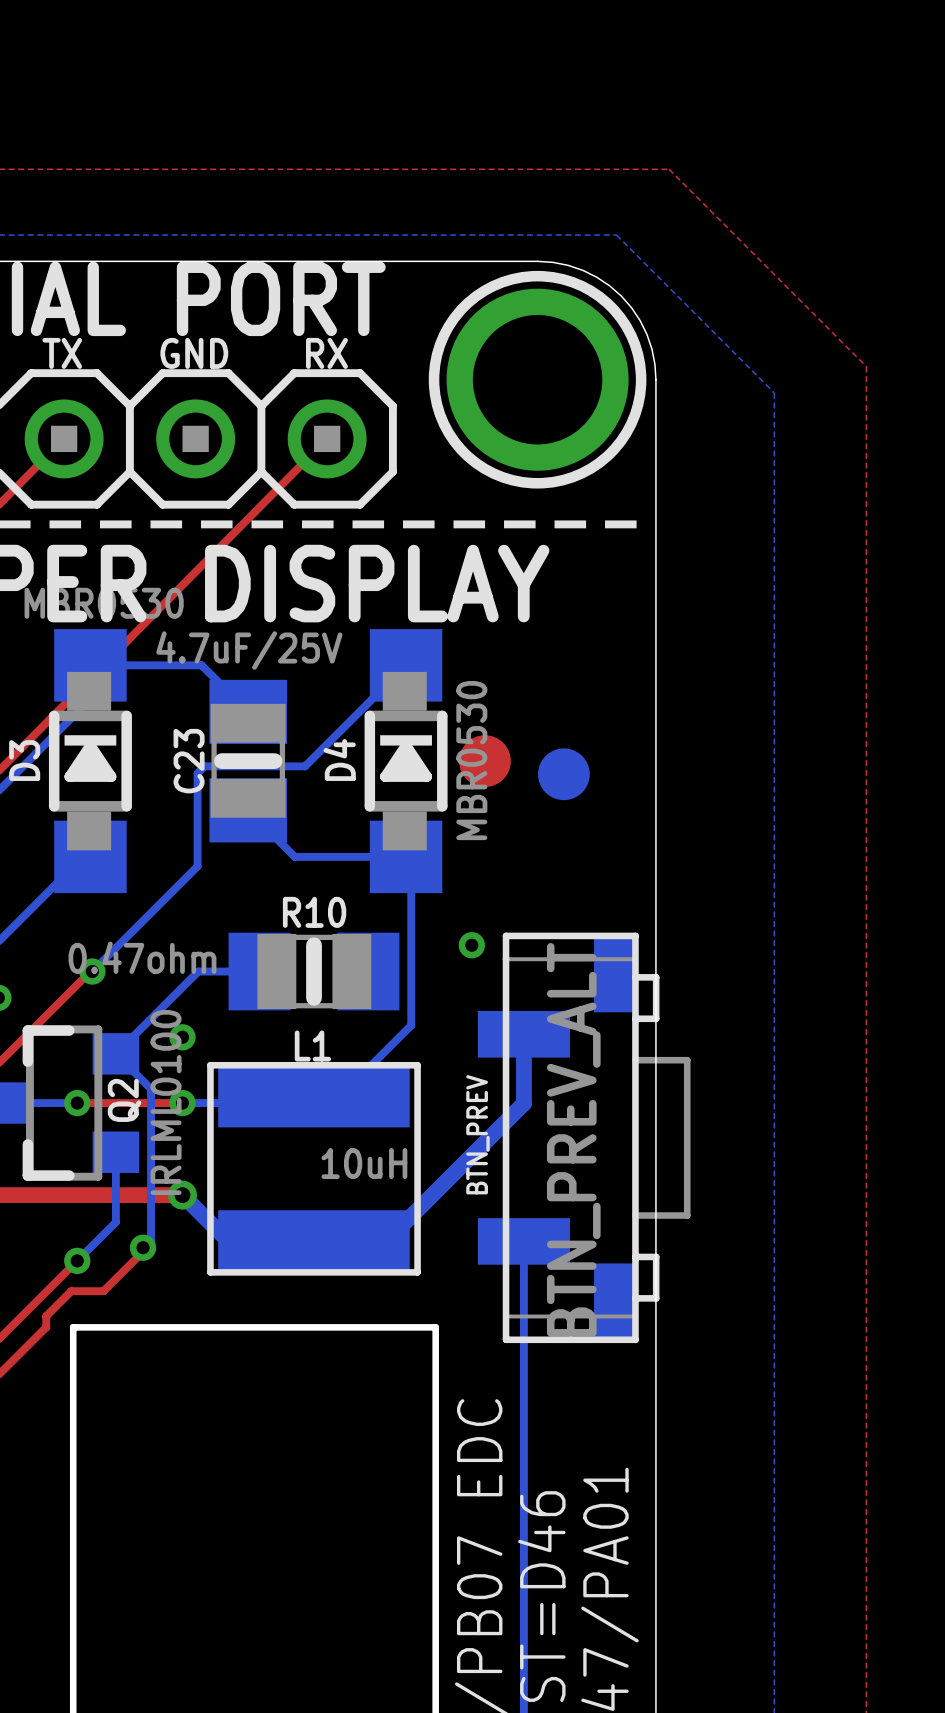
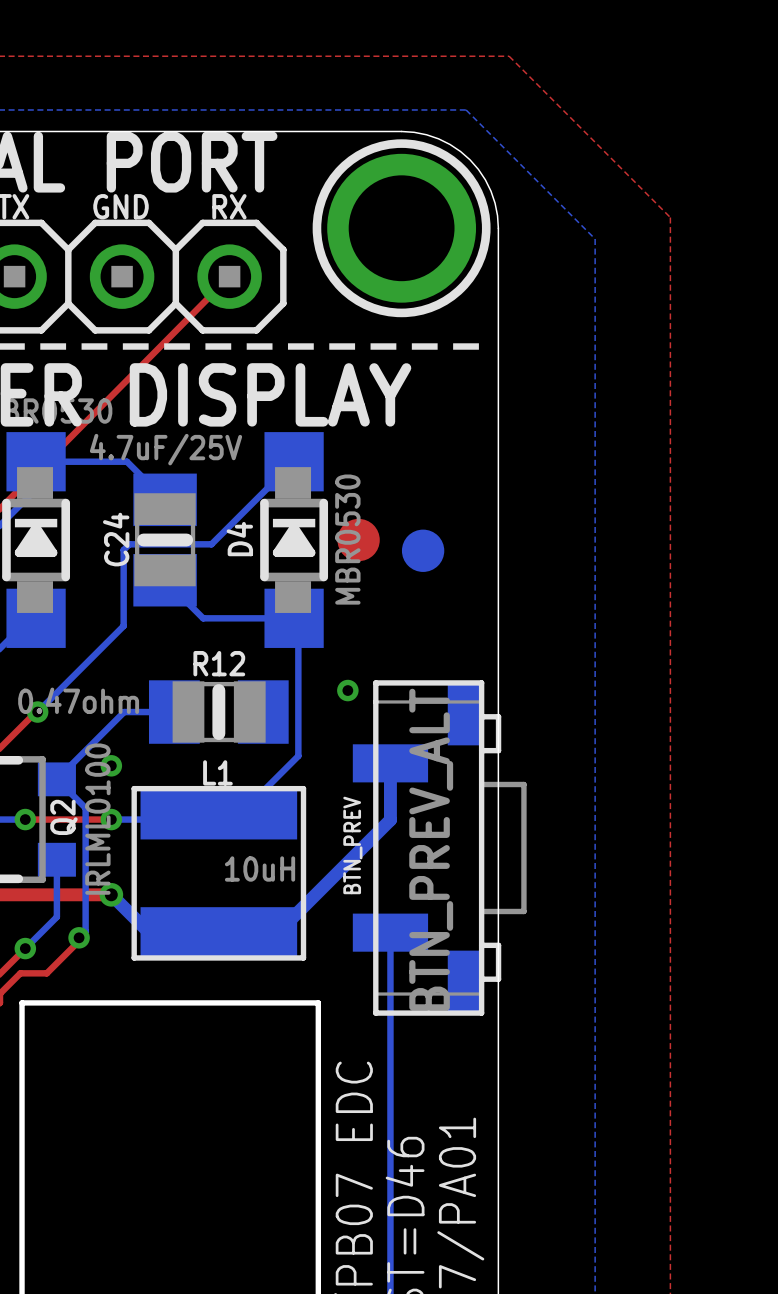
C23 name: C23 (189, 761) -> C24 (116, 539)
R10 name: R10 (314, 912) -> R12 (219, 663)

